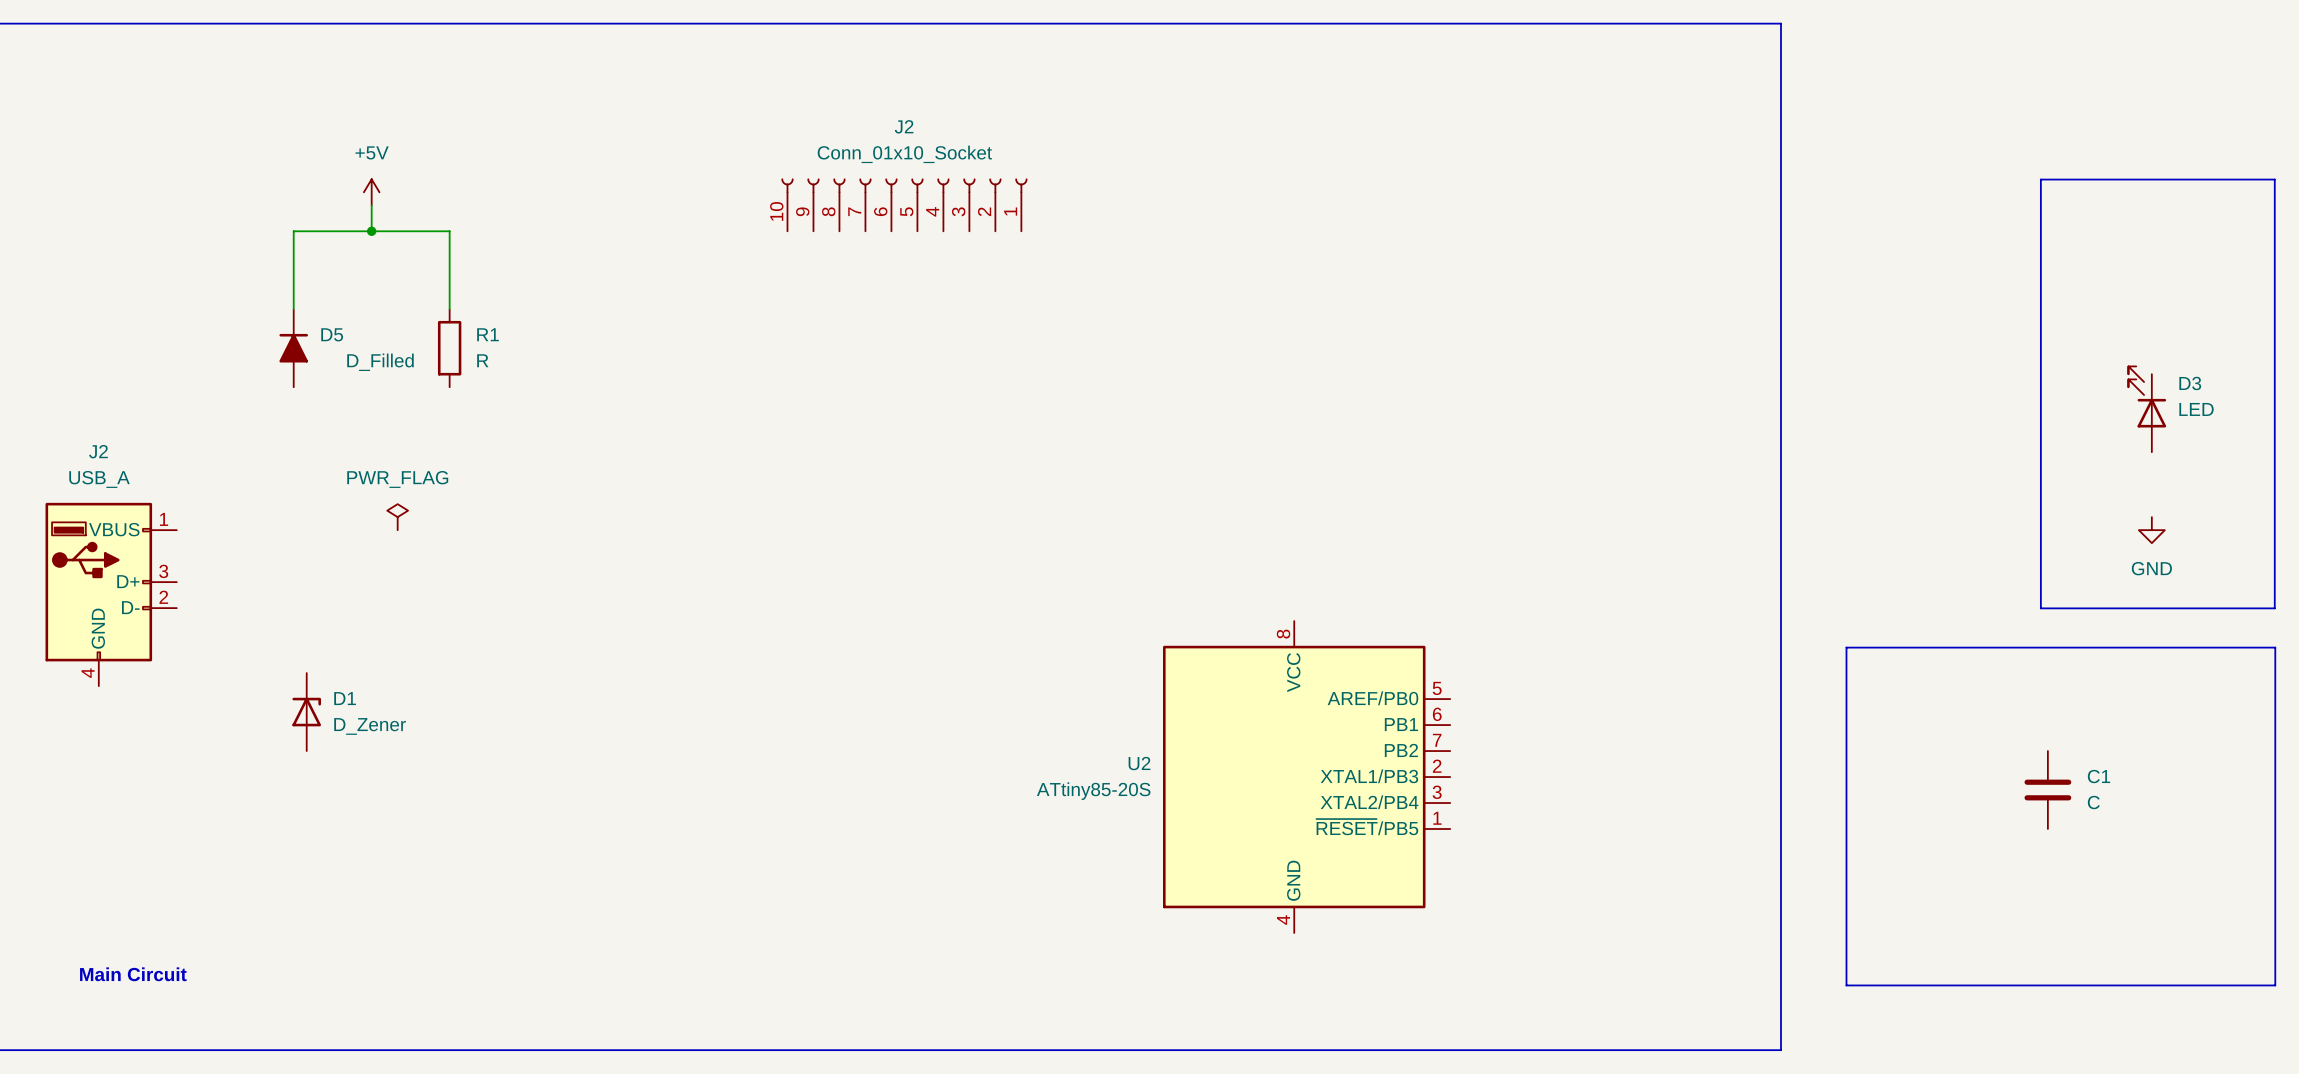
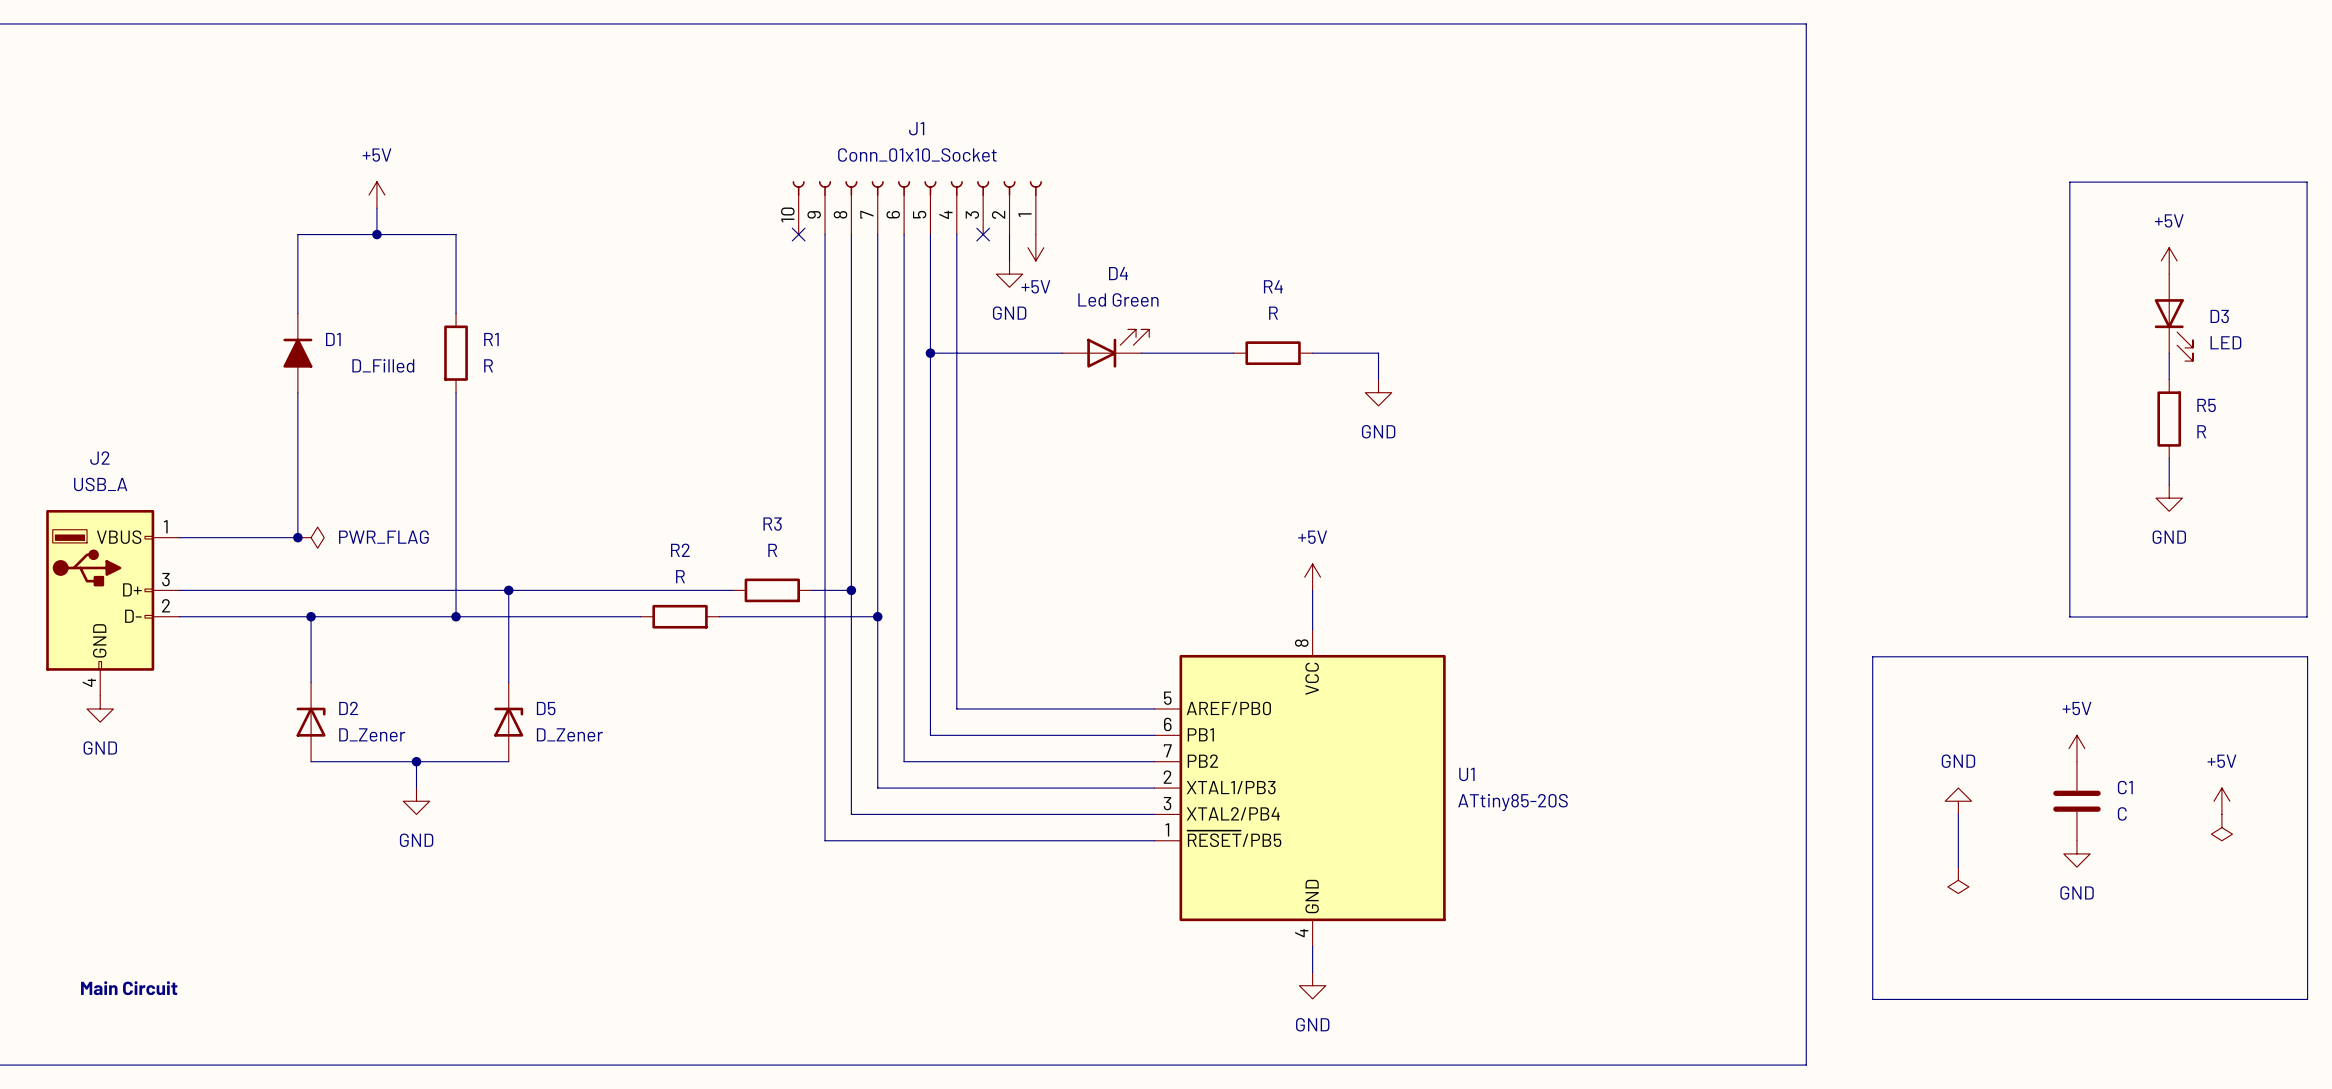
J2 name: J2 (904, 126) -> J1 (916, 128)
no-connect mark: none -> (798, 234)
wire: none -> (825, 234) (825, 840) (1154, 840)
wire: none -> (851, 234) (851, 814) (1154, 814)
wire: none -> (877, 234) (877, 788) (1154, 788)
wire: none -> (904, 234) (904, 761) (1154, 761)
wire: none -> (930, 234) (930, 735) (1154, 735)
wire: none -> (956, 234) (956, 708) (1154, 708)
no-connect mark: none -> (983, 234)
wire: none -> (1009, 234) (1009, 260)
power symbol: none -> +5V (1035, 247)
power symbol: none -> +5V (2169, 260)
power symbol: none -> GND (1009, 274)
D5 name: D5 (332, 334) -> D1 (333, 339)
D4: none -> Led Green (1105, 348)
wire: none -> (930, 353) (1062, 353)
junction: none -> (930, 353)
wire: none -> (1141, 353) (1233, 353)
R4: none -> R (1273, 353)
wire: none -> (1312, 353) (1378, 353) (1378, 379)
wire: none -> (2169, 353) (2169, 379)
D3 name position: D3 (2190, 383) -> D3 (2219, 316)
wire: none -> (297, 392) (297, 537) (179, 537)
wire: none -> (456, 392) (456, 616)
power symbol: none -> GND (1378, 392)
D3 rotation: 0° (2147, 396) -> 180° (2173, 330)
D3 position: (2147, 409) -> (2173, 317)
D3 value position: LED (2196, 409) -> LED (2225, 342)
R5: none -> R (2169, 419)
wire: none -> (2169, 458) (2169, 484)
power symbol text position: PWR_FLAG (397, 479) -> PWR_FLAG (383, 537)
power symbol rotation: 0° (397, 517) -> 90° clockwise (311, 537)
power symbol position: PWR_FLAG (397, 517) -> PWR_FLAG (311, 537)
junction: none -> (297, 537)
power symbol position: GND (2151, 530) -> GND (2169, 498)
power symbol: none -> +5V (1312, 577)
wire: none -> (179, 590) (732, 590)
wire: none -> (508, 590) (508, 682)
junction: none -> (508, 590)
R3: none -> R (772, 590)
wire: none -> (811, 590) (851, 590)
junction: none -> (851, 590)
wire: none -> (1312, 590) (1312, 629)
wire: none -> (179, 616) (640, 616)
wire: none -> (311, 616) (311, 682)
junction: none -> (311, 616)
junction: none -> (456, 616)
R2: none -> R (680, 616)
wire: none -> (719, 616) (877, 616)
junction: none -> (877, 616)
D1 name: D1 (345, 698) -> D2 (348, 708)
power symbol: none -> GND (100, 708)
D5: none -> D_Zener (508, 722)
power symbol: none -> +5V (2076, 748)
wire: none -> (311, 761) (508, 761)
wire: none -> (416, 761) (416, 788)
junction: none -> (416, 761)
U1: none -> ATtiny85-20S (1300, 788)
U2: ATtiny85-20S (1306, 777) -> none
power symbol: none -> GND (416, 801)
power symbol: none -> GND (1958, 801)
power symbol: none -> +5V (2221, 801)
wire: none -> (1958, 814) (1958, 867)
power symbol: none -> (2221, 827)
power symbol: none -> GND (2076, 853)
power symbol: none -> (1958, 880)
wire: none -> (1312, 946) (1312, 972)
power symbol: none -> GND (1312, 985)

